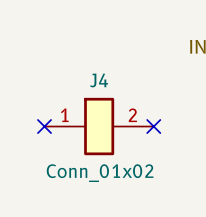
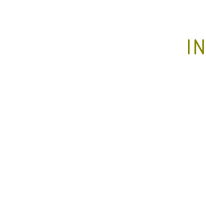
no-connect mark: (44, 126) -> none
J4: Conn_01x02 (99, 126) -> none
no-connect mark: (153, 126) -> none

